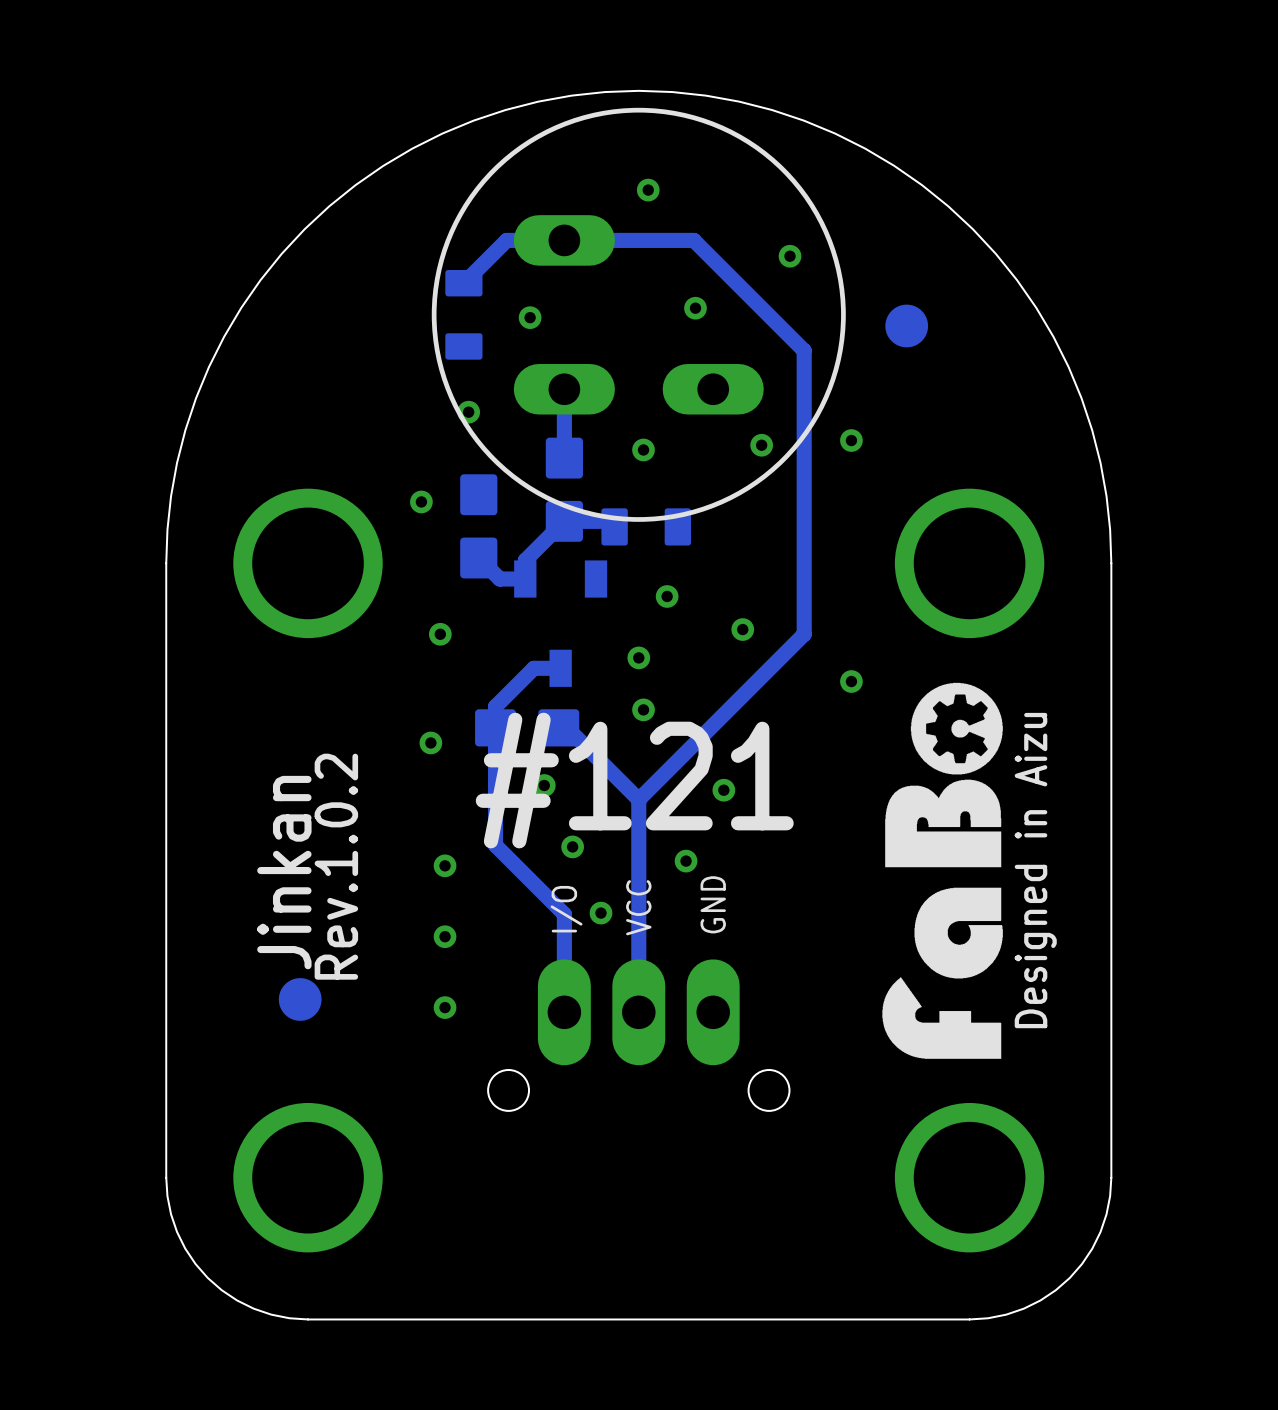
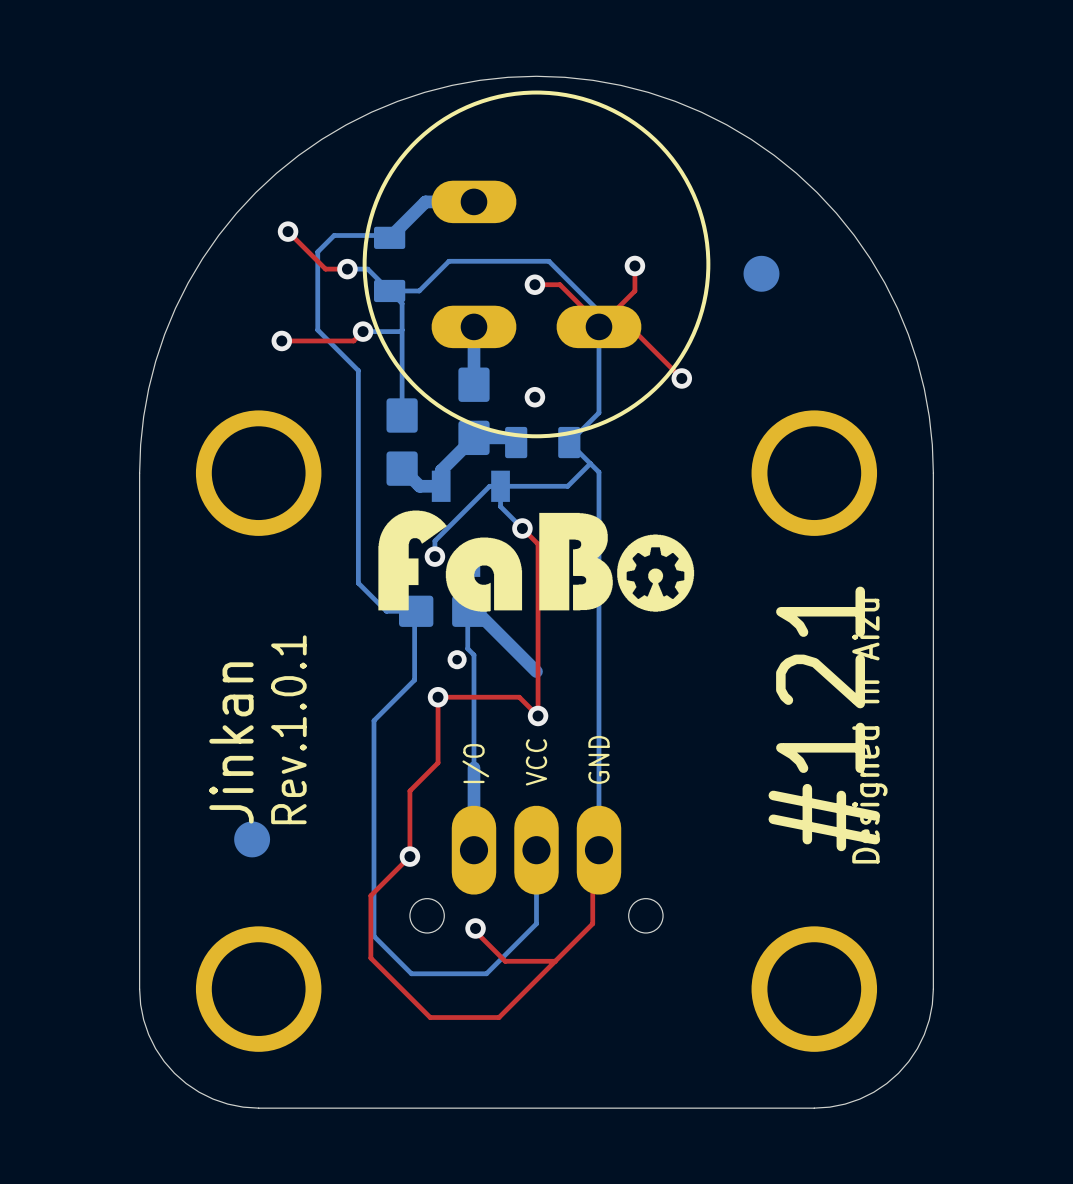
via: (648, 190) -> none
bottom track: (564, 240) (693, 240) (804, 350) (804, 634) (638, 799) (638, 1012) -> (414, 611) (414, 680) (373, 720) (373, 936) (411, 973) (486, 973) (536, 923) (536, 850)
via: (790, 256) -> none
top track: none -> (288, 231) (325, 269) (347, 269)
via: none -> (288, 231)
bottom track: none -> (391, 235) (334, 235) (317, 251) (317, 330) (358, 370) (358, 583) (386, 611) (416, 611)
via: (695, 308) -> none
top track: none -> (634, 265) (634, 290) (598, 326) (630, 326) (681, 378)
via: none -> (634, 265)
via: (530, 317) -> none
bottom track: none -> (347, 269) (367, 269) (402, 303) (402, 415)
via: none -> (347, 269)
top track: none -> (534, 284) (559, 284) (600, 325)
via: none -> (534, 284)
bottom track: none -> (389, 290) (419, 290) (448, 261) (548, 261) (598, 311) (598, 412) (569, 442) (598, 472) (598, 850)
bottom track: none -> (402, 330) (363, 331)
top track: none -> (363, 331) (353, 340) (281, 340)
via: none -> (363, 331)
via: none -> (281, 340)
via: (468, 412) -> none
via: (851, 440) -> none
via: (761, 445) -> none
via position: (643, 449) -> (534, 397)
via: none -> (681, 378)
via: (421, 501) -> none
bottom track: none -> (590, 463) (567, 486) (489, 486) (434, 540) (434, 556)
bottom track: none -> (500, 486) (500, 506) (522, 528)
via: (667, 596) -> none
drawing: none -> [378, 510, 695, 612]
top track: none -> (522, 528) (538, 544) (538, 715) (519, 697) (438, 697) (438, 762) (409, 790) (409, 856) (370, 895) (370, 958) (430, 1017) (498, 1017) (592, 923) (592, 856) (598, 850)
via: none -> (522, 528)
via: (742, 629) -> none
via: (440, 634) -> none
via: (638, 657) -> none
via: none -> (434, 556)
bottom track: (560, 668) (533, 668) (495, 706) (495, 845) (564, 914) -> (470, 561) (470, 609) (467, 612) (467, 648) (473, 655) (473, 767)
via: (851, 681) -> none
drawing: [882, 682, 1003, 1059] -> none
via: (643, 709) -> none
via: (430, 742) -> none
text rotation: 0° (634, 780) -> 90° counterclockwise (824, 718)
via: (723, 790) -> none
via: none -> (438, 697)
via: (572, 846) -> none
via: none -> (538, 715)
via: (686, 861) -> none
via: (445, 865) -> none
text: Rev.1.0.2 (336, 866) -> Rev.1.0.1 (288, 729)
text position: Jinkan (284, 872) -> Jinkan (231, 742)
via: (600, 913) -> none
via: (445, 936) -> none
via: (445, 1007) -> none
via: none -> (409, 856)
top track: none -> (475, 928) (473, 930) (505, 961) (555, 961)
via: none -> (475, 928)

